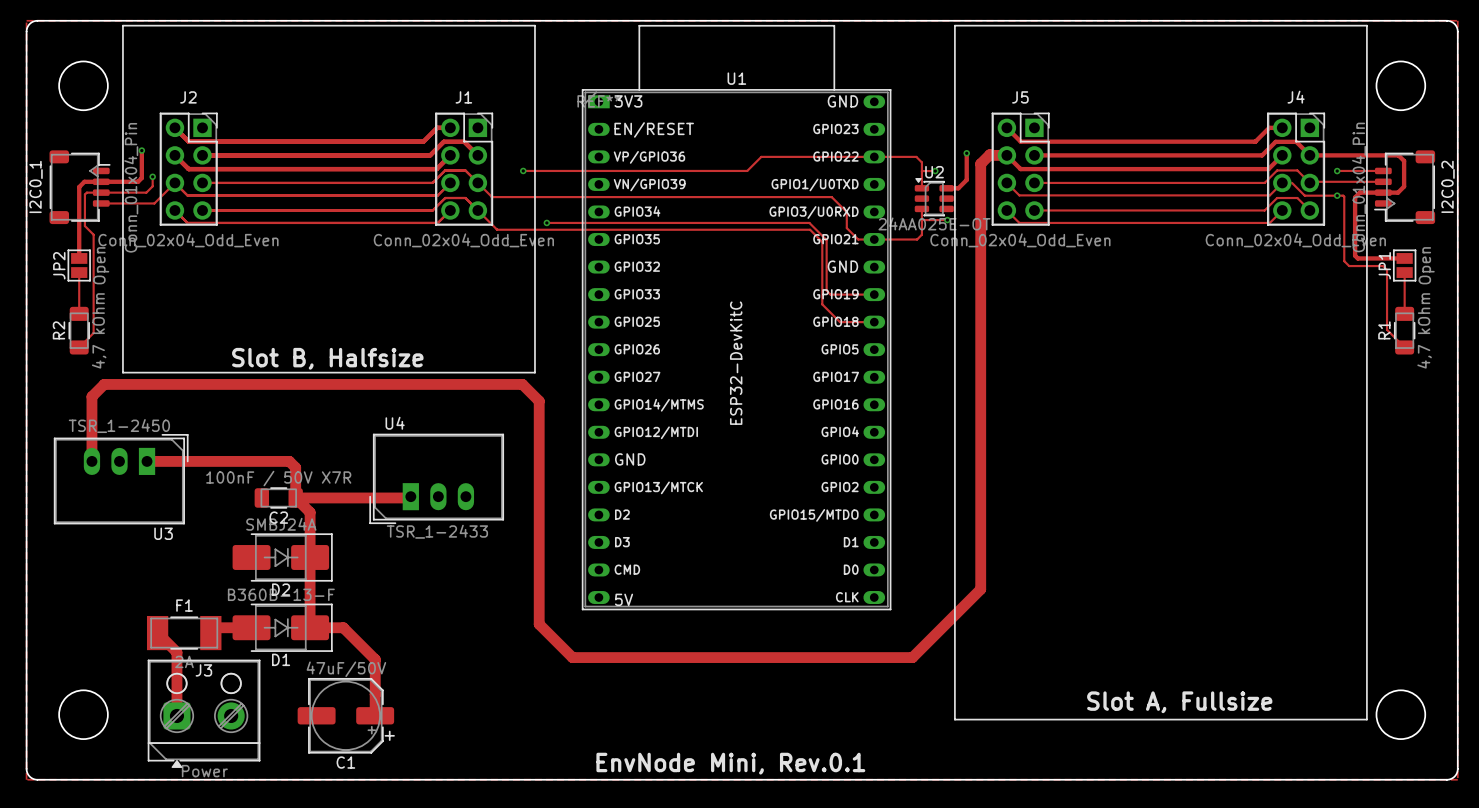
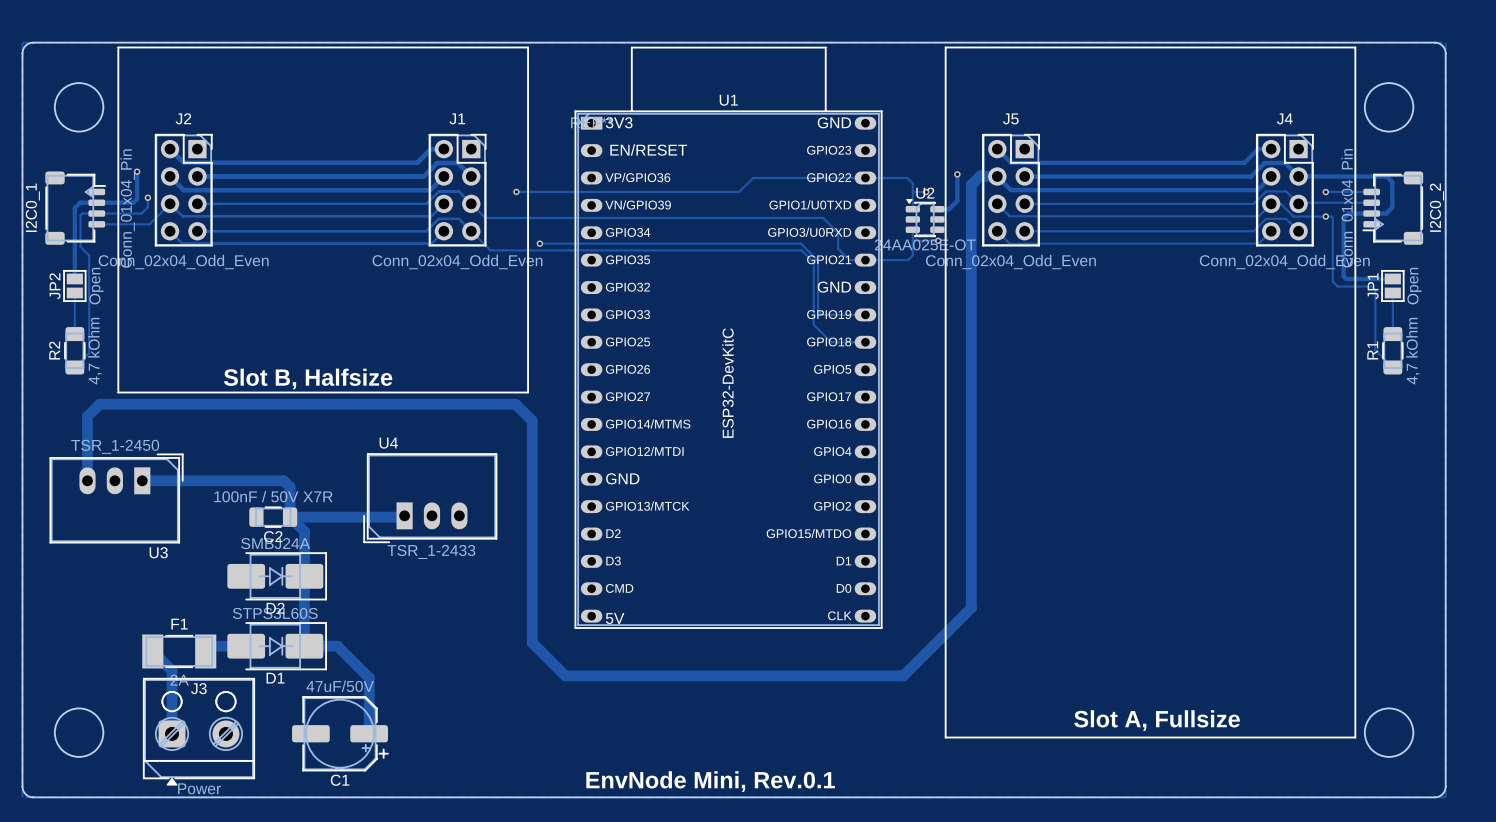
D1 value: B360B-13-F (281, 594) -> STPS3L60S (275, 613)

